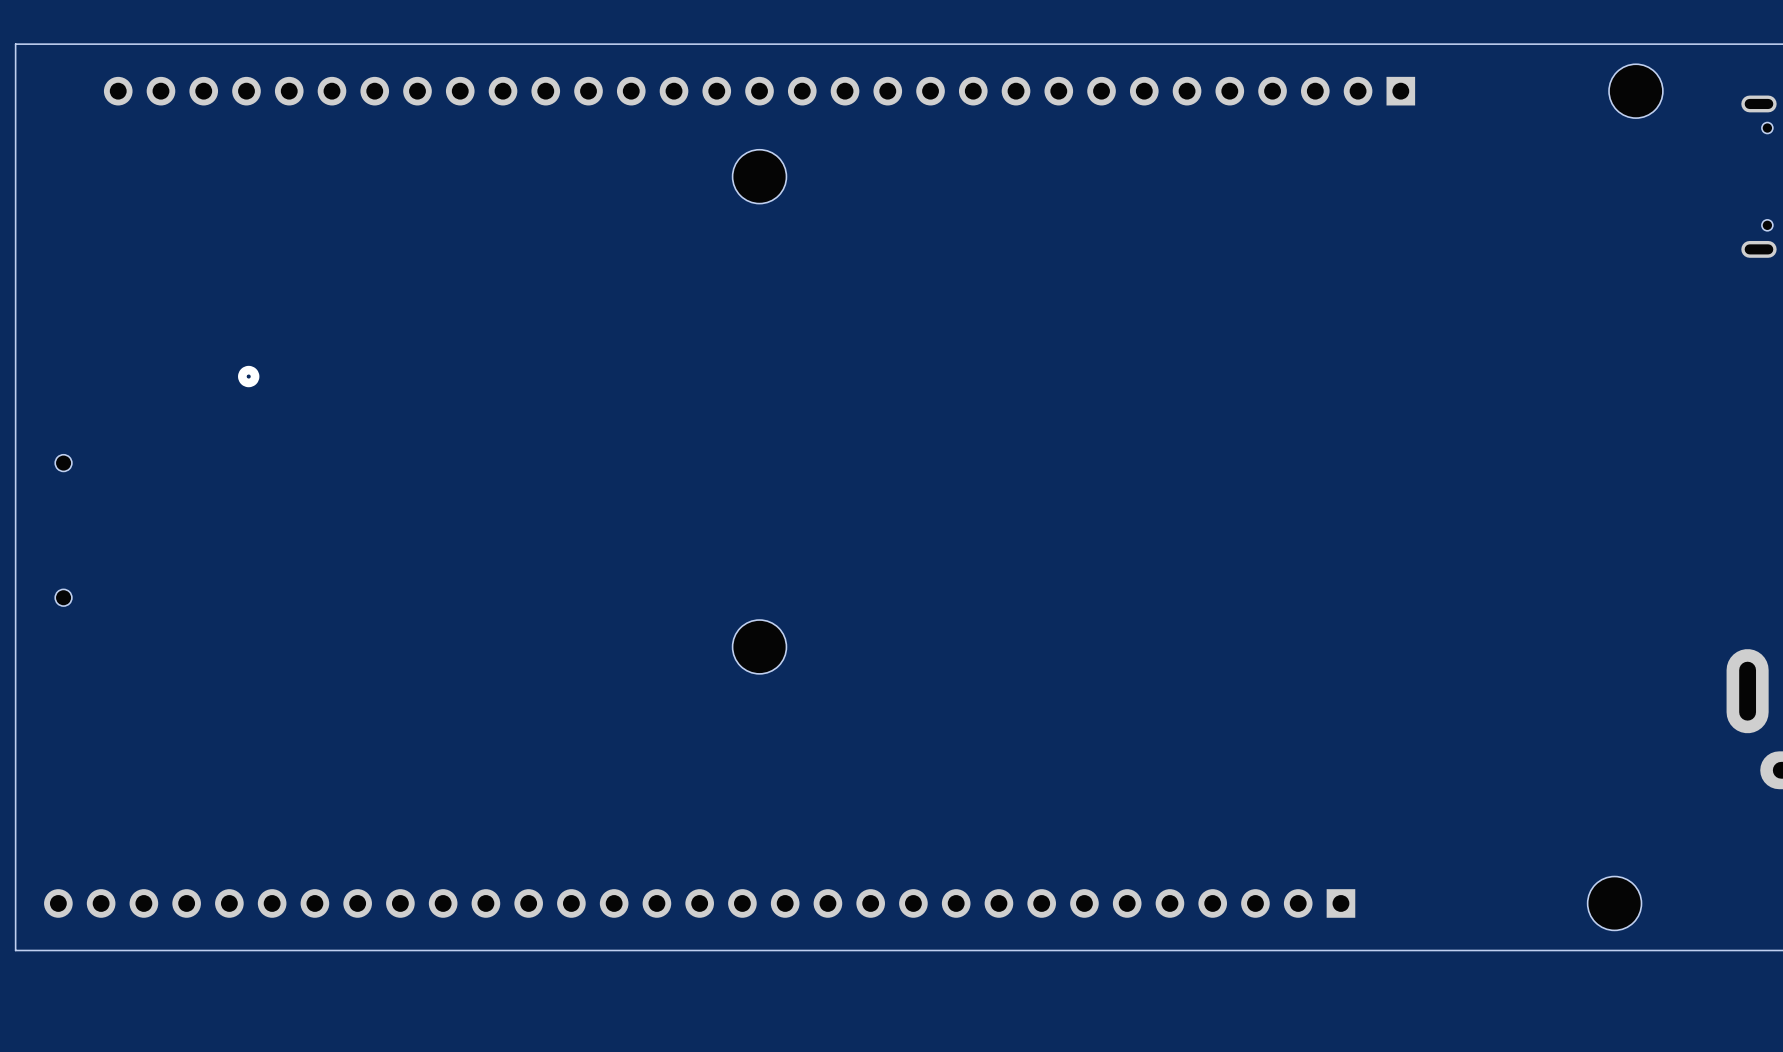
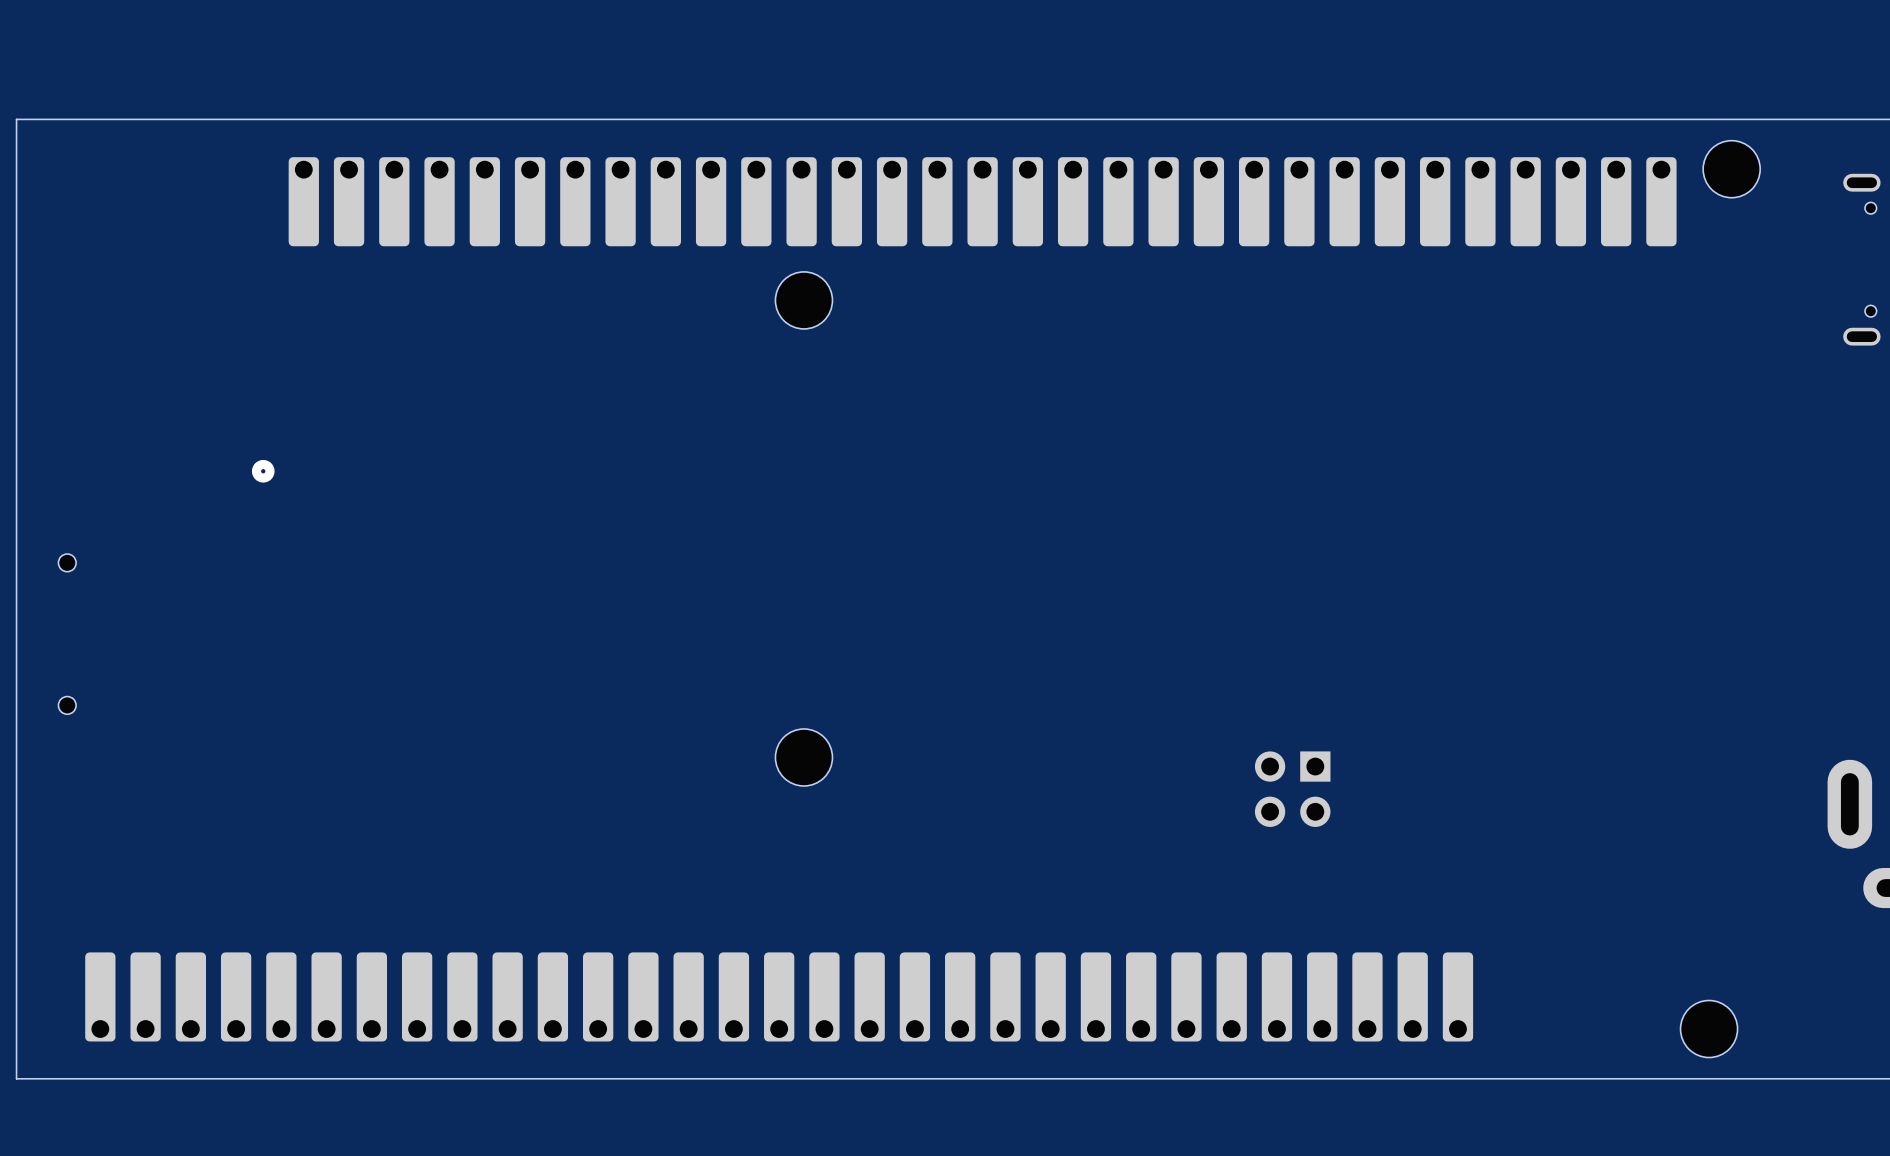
part: (759, 91) -> none
part: none -> (982, 201)
part position: (759, 176) -> (803, 300)
part: none -> (1292, 789)
part: none -> (779, 996)
part: (699, 903) -> none

